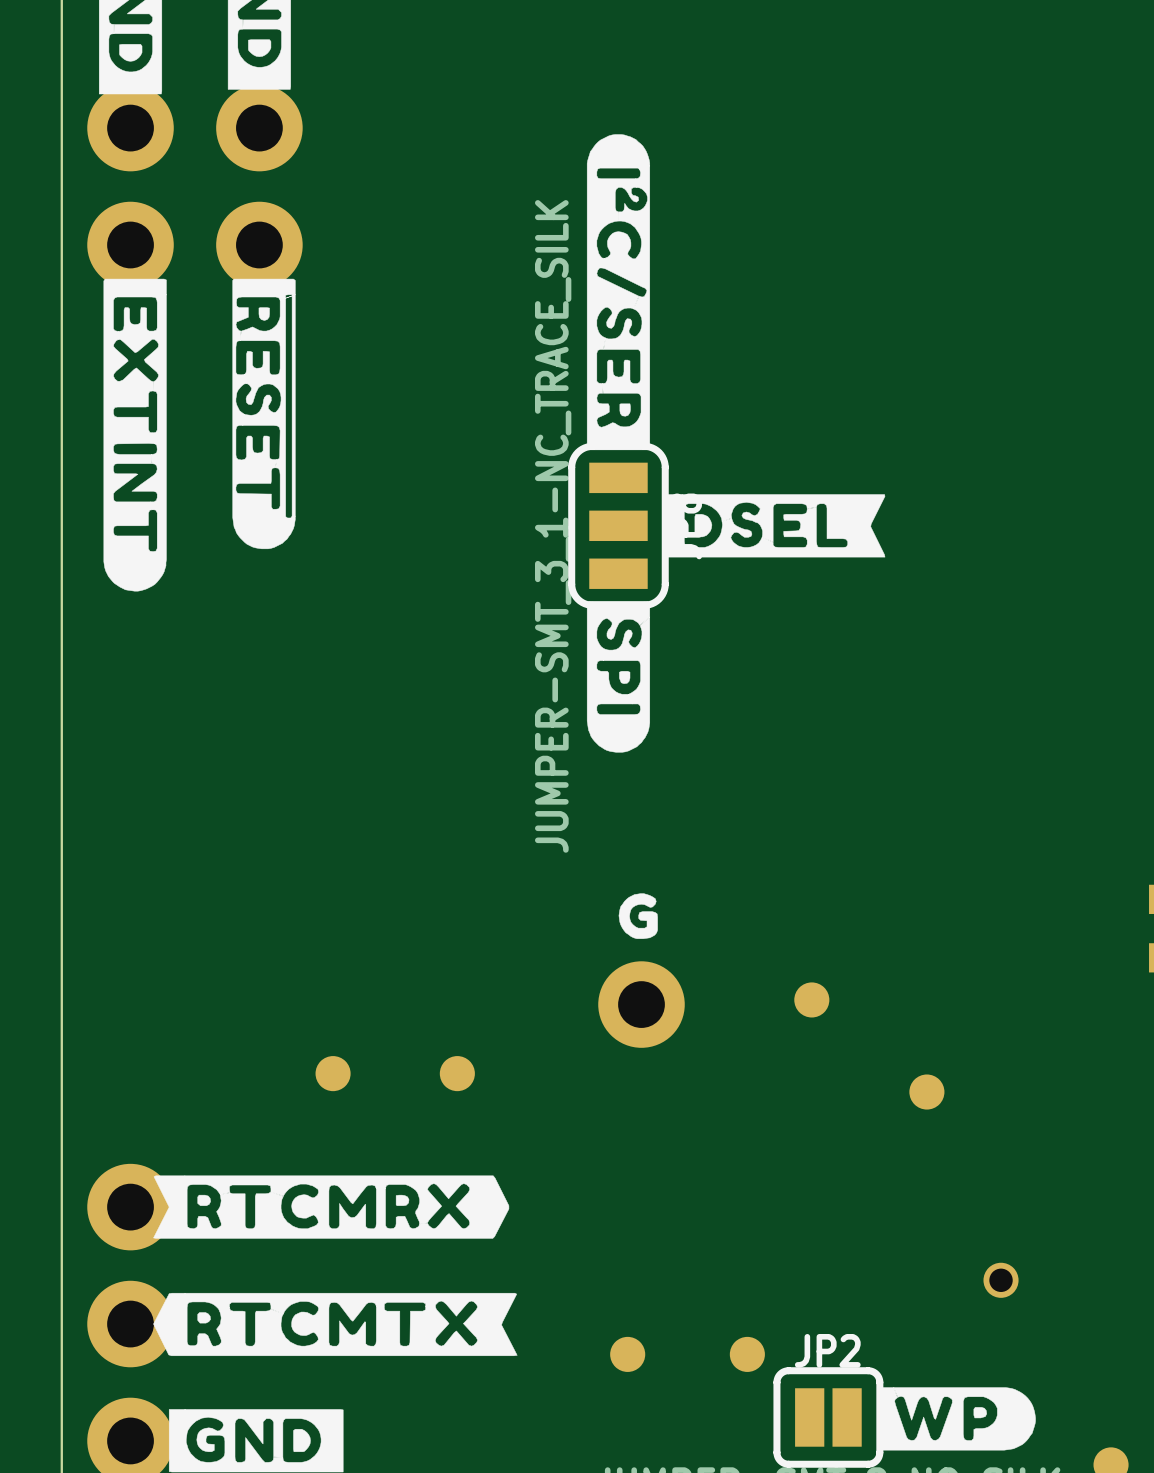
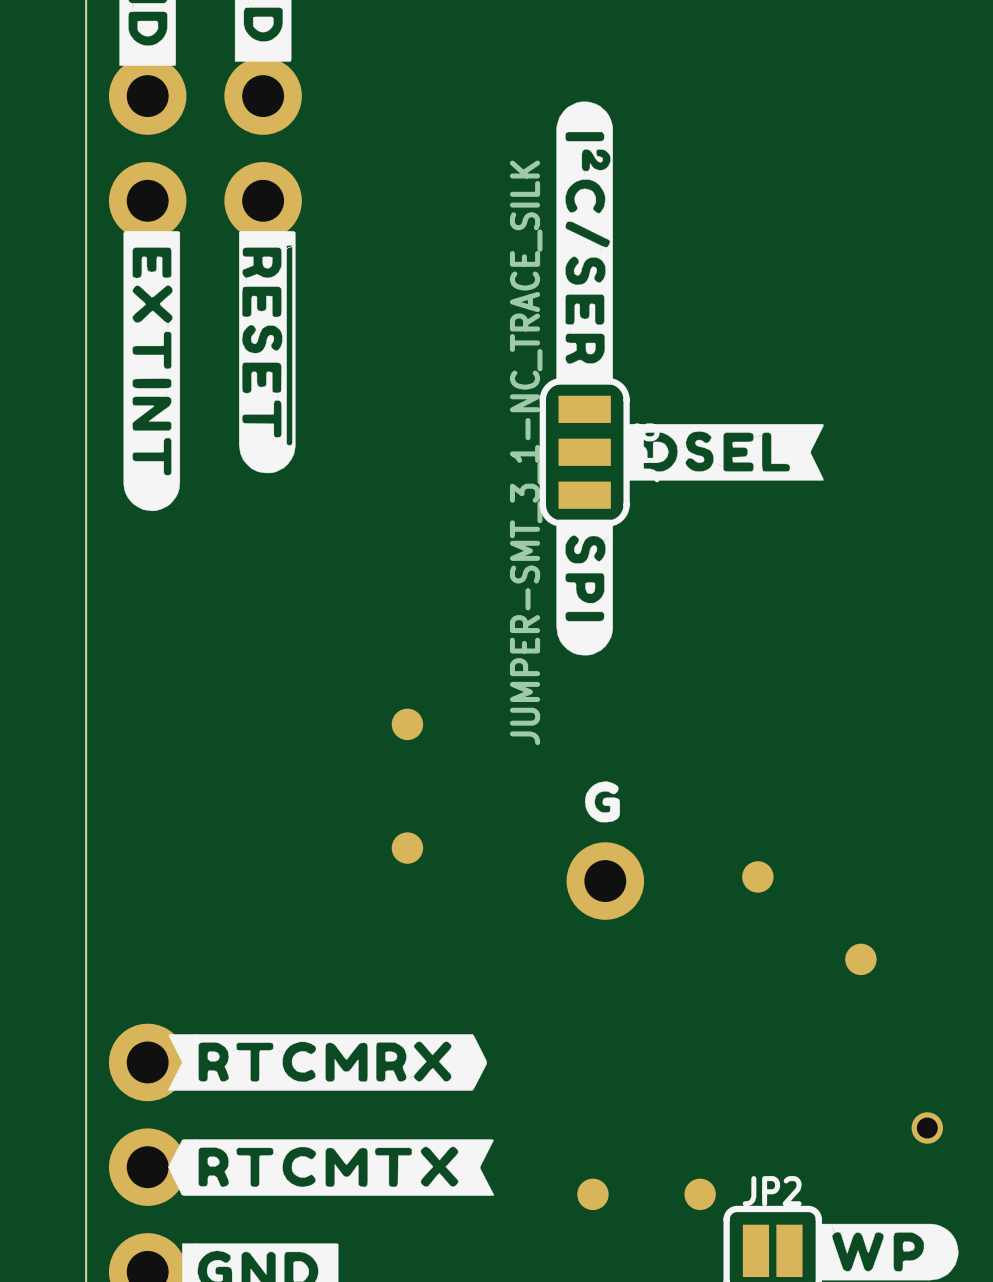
part: none -> (407, 724)
part: none -> (407, 848)
part: (333, 1073) -> none
part: (457, 1073) -> none

